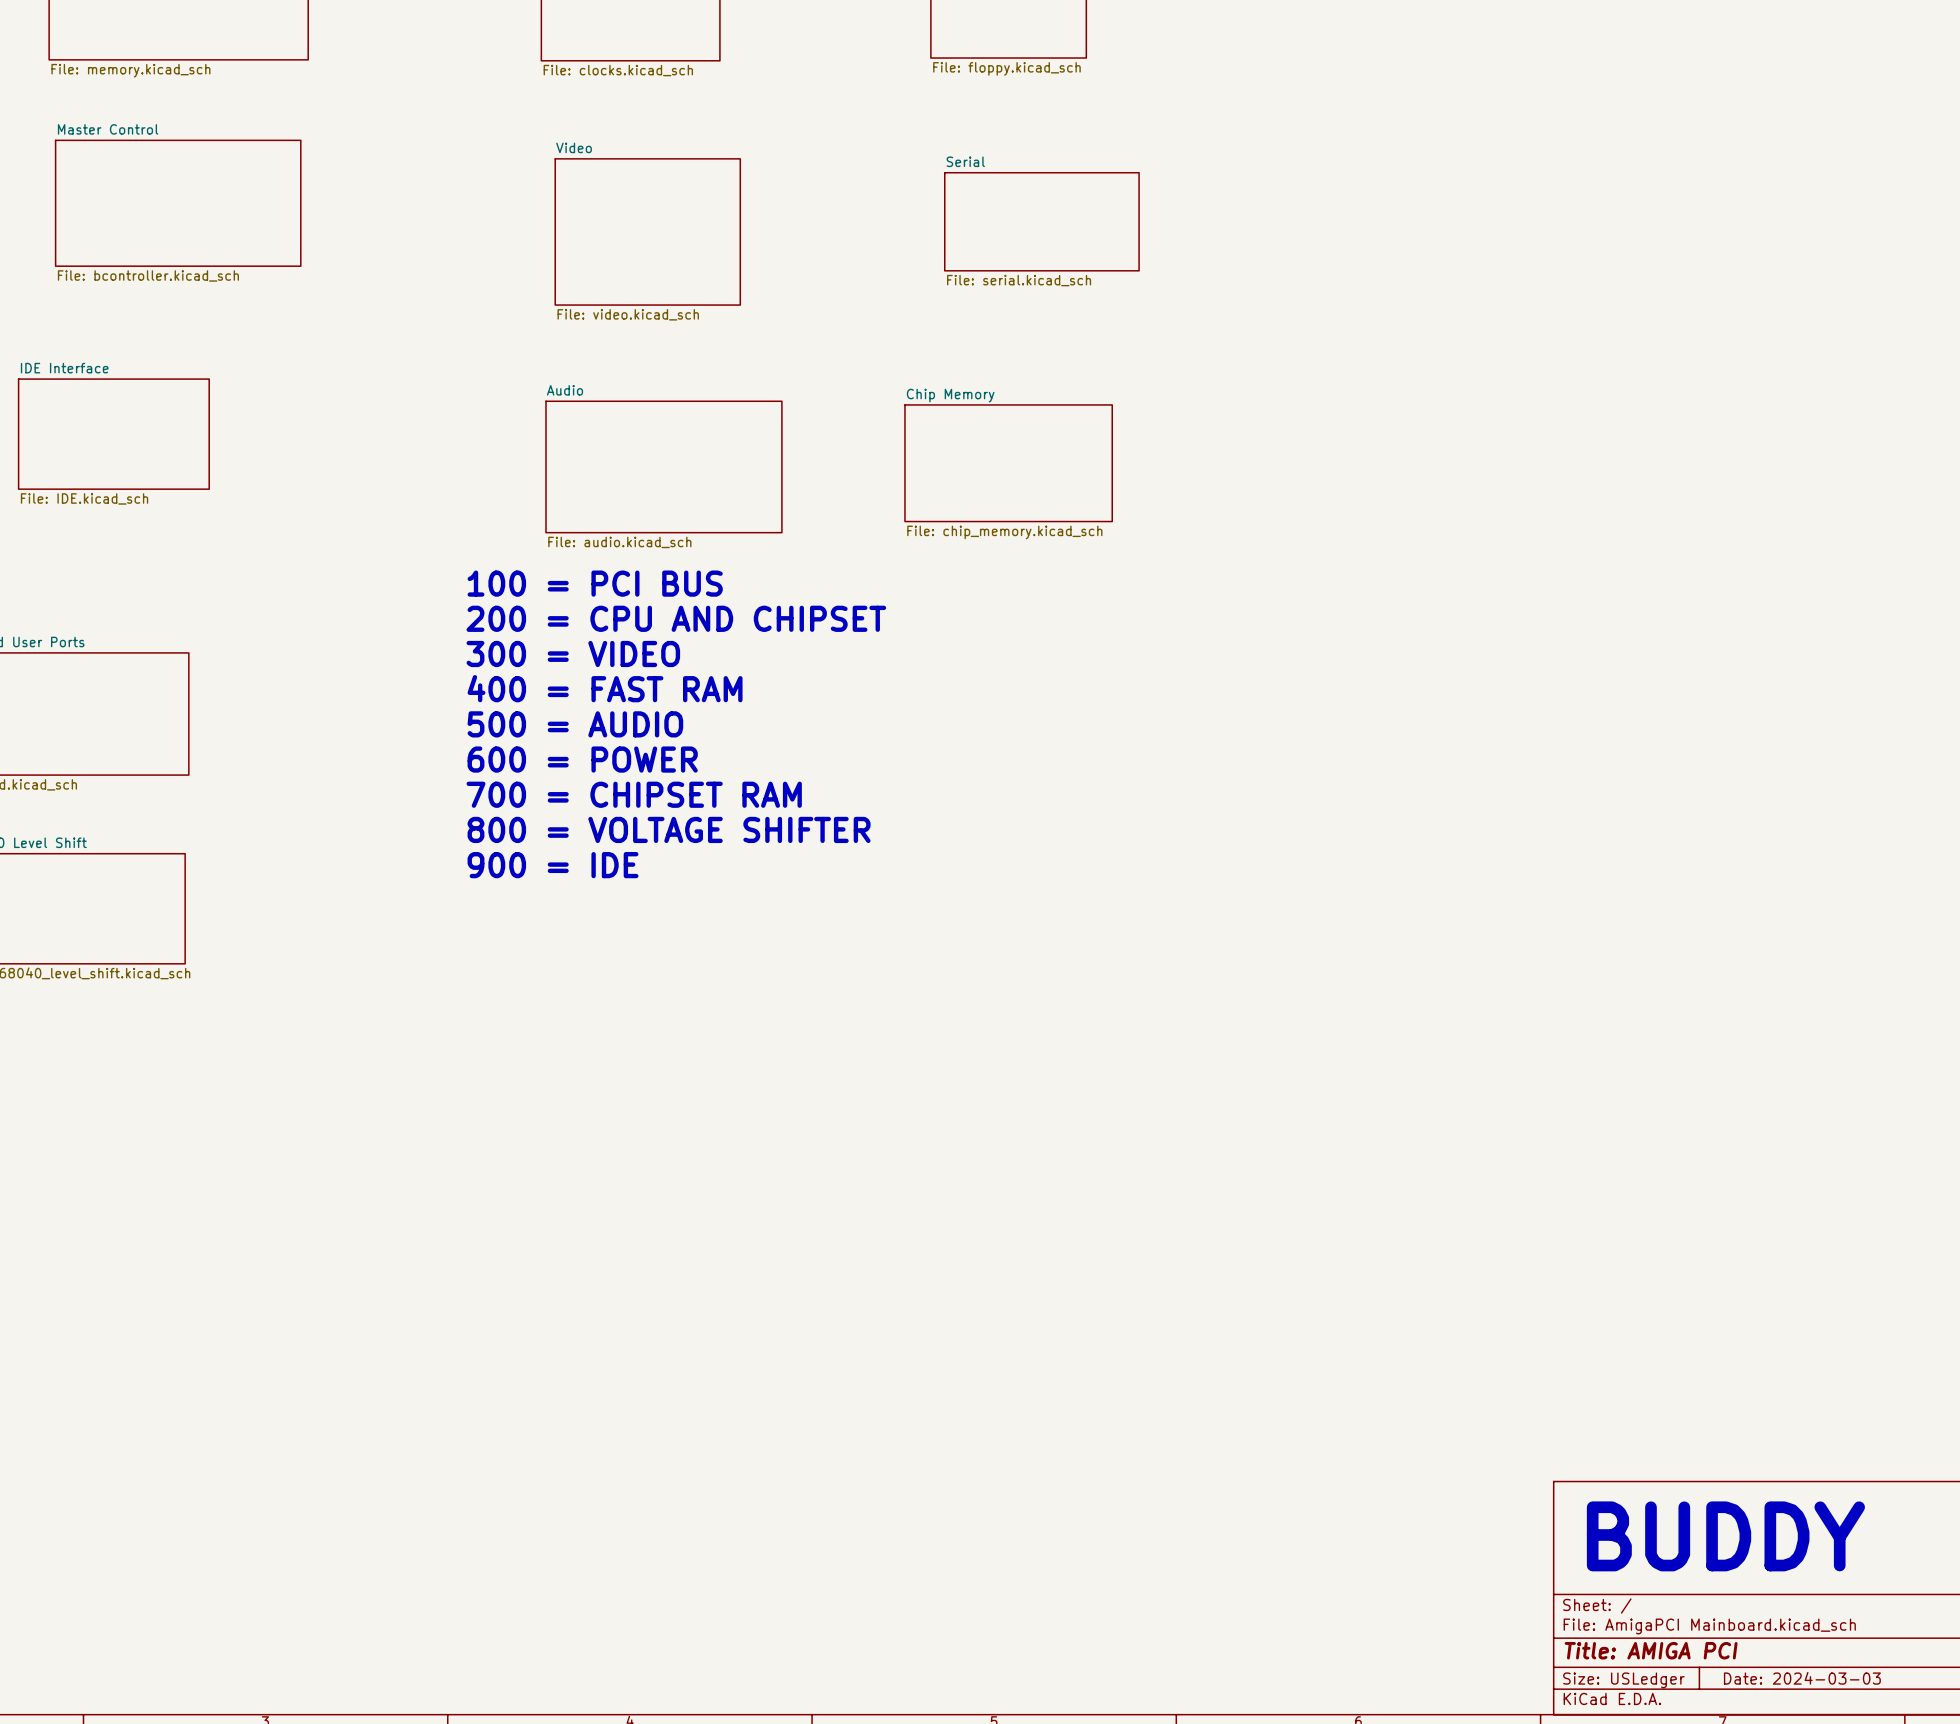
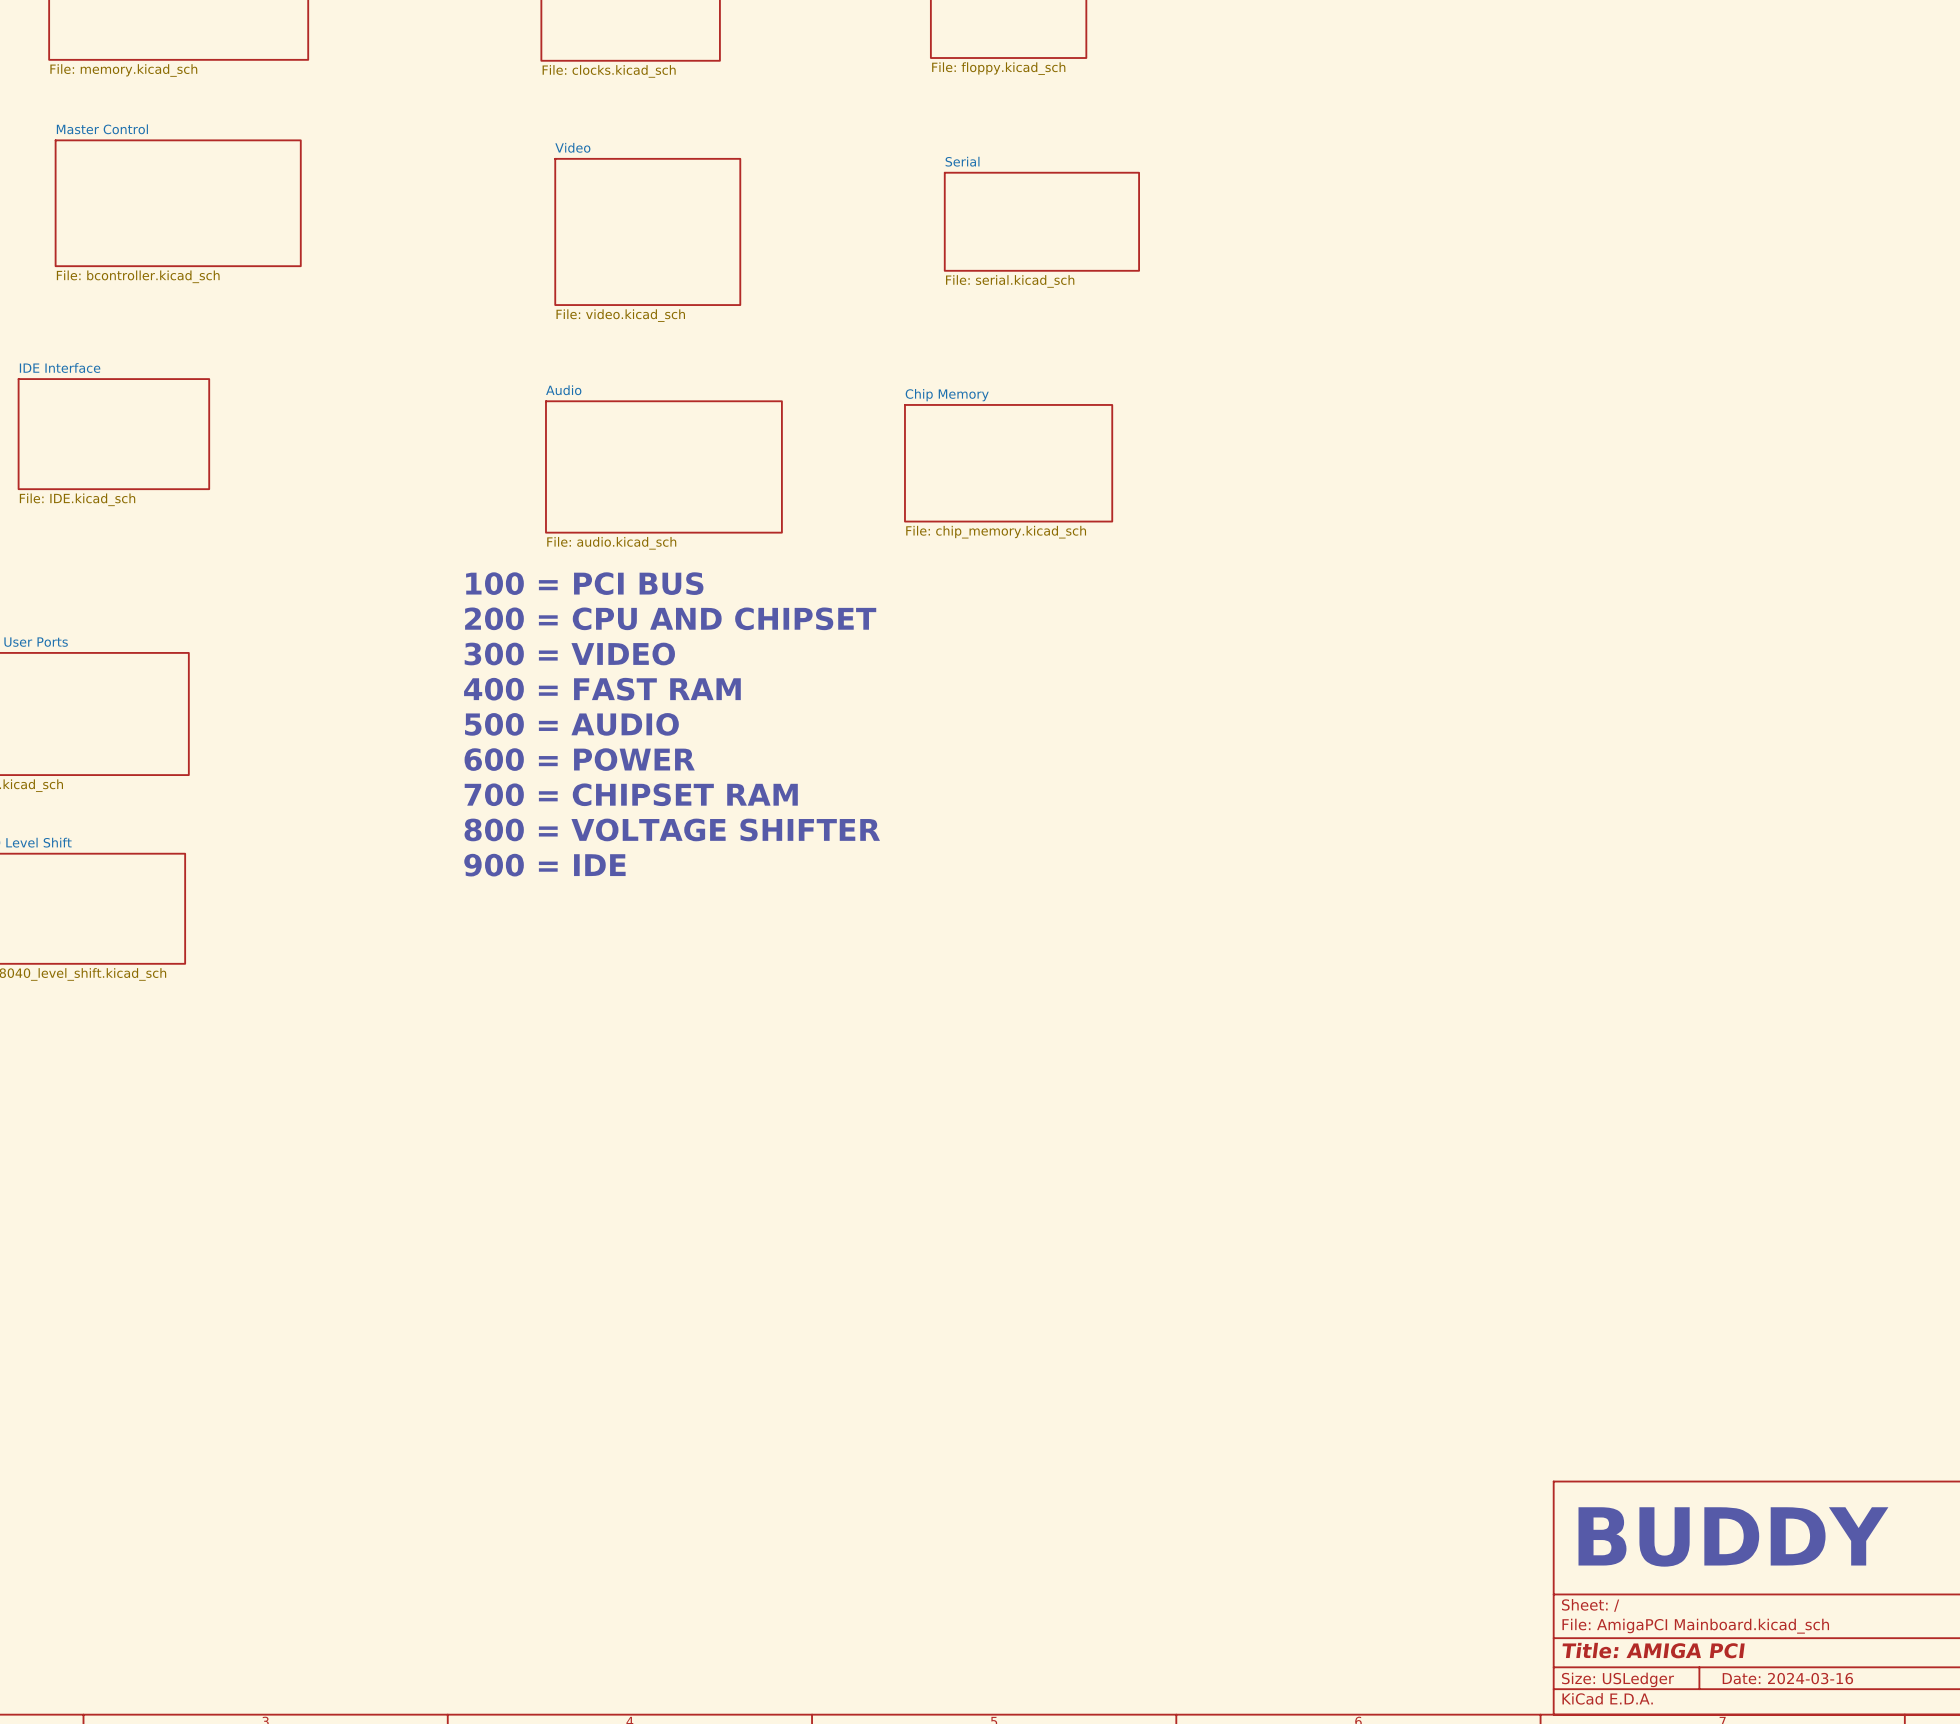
title block: Date: 2024-03-03 (1802, 1678) -> Date: 2024-03-16 (1787, 1678)

